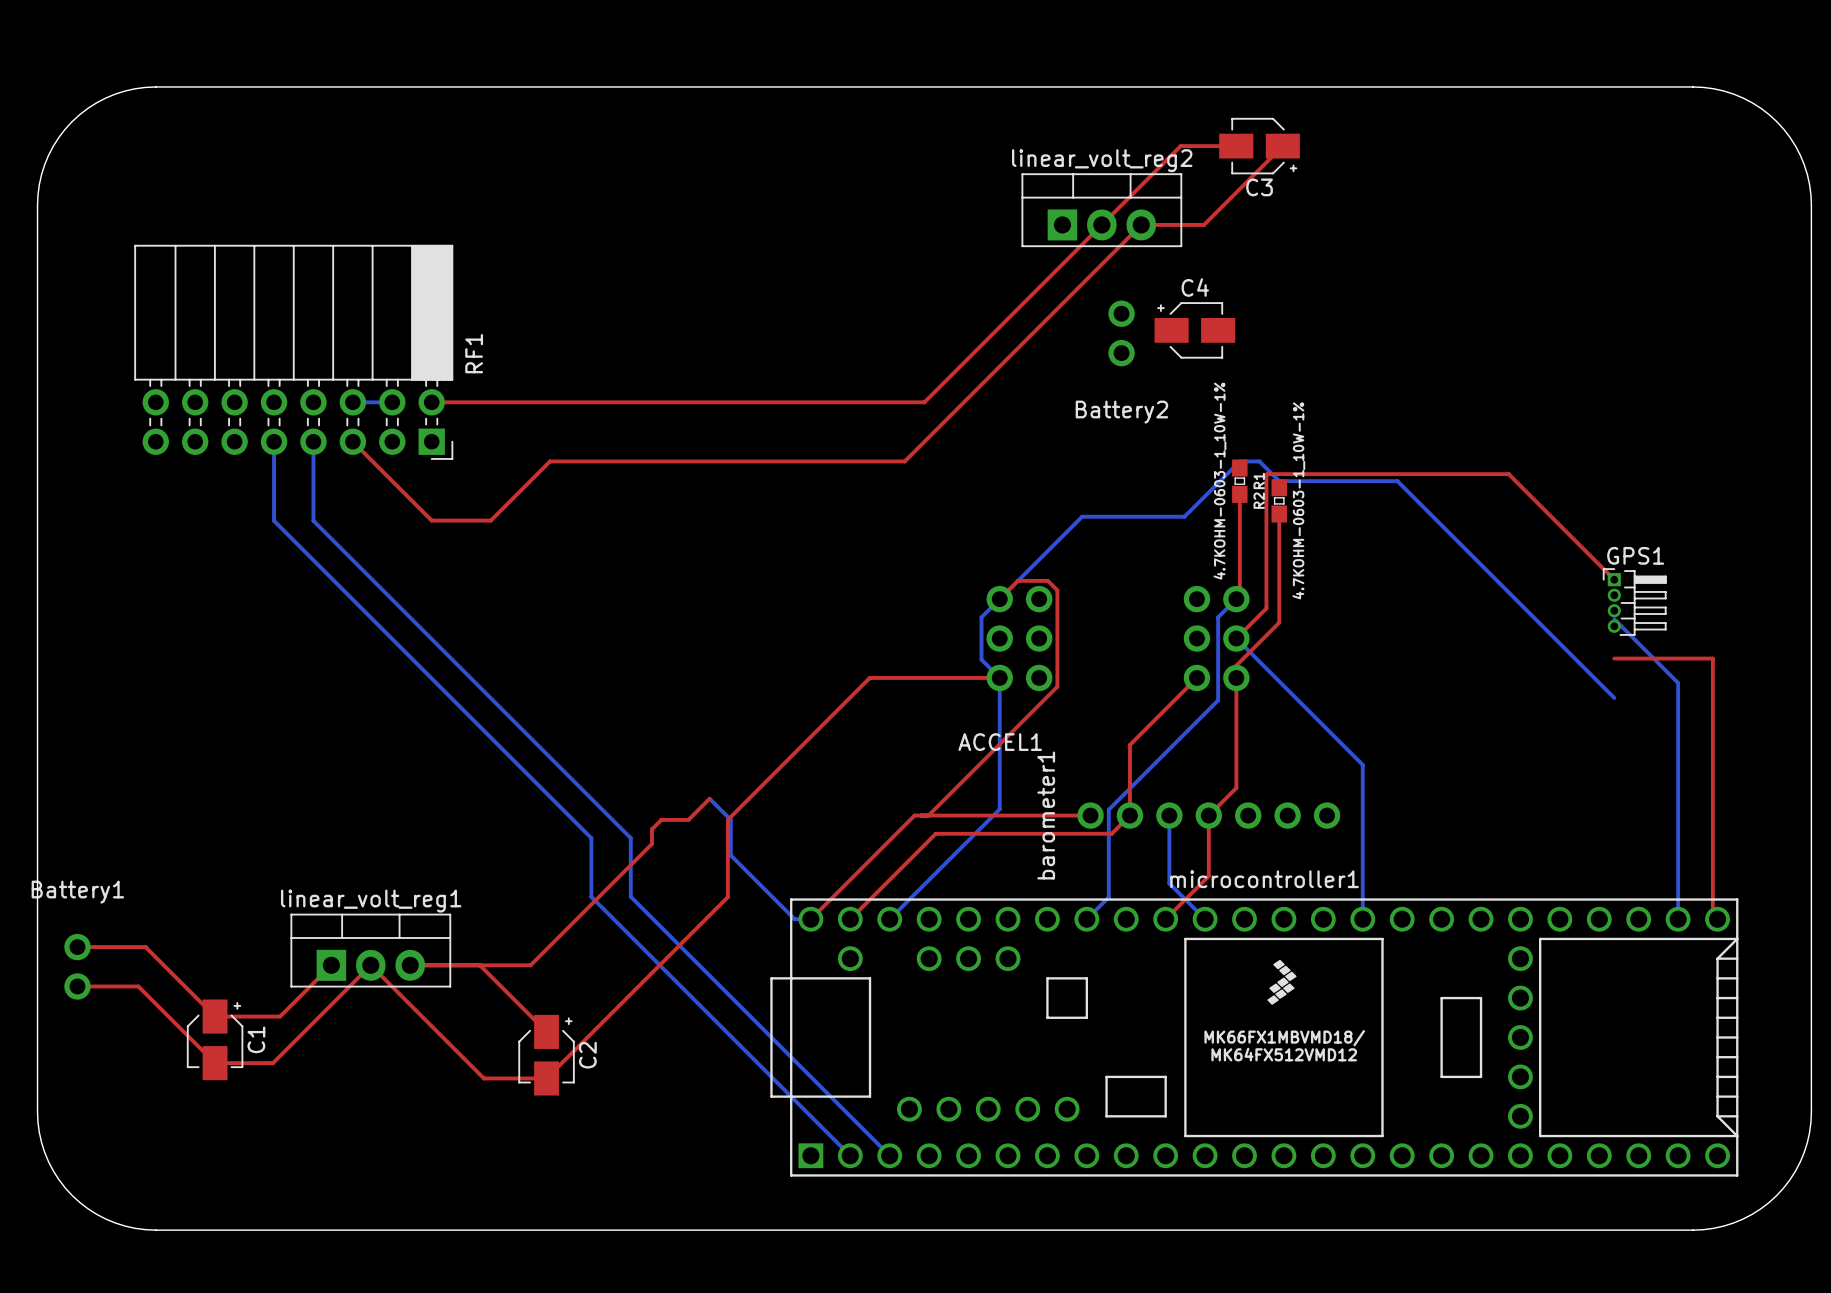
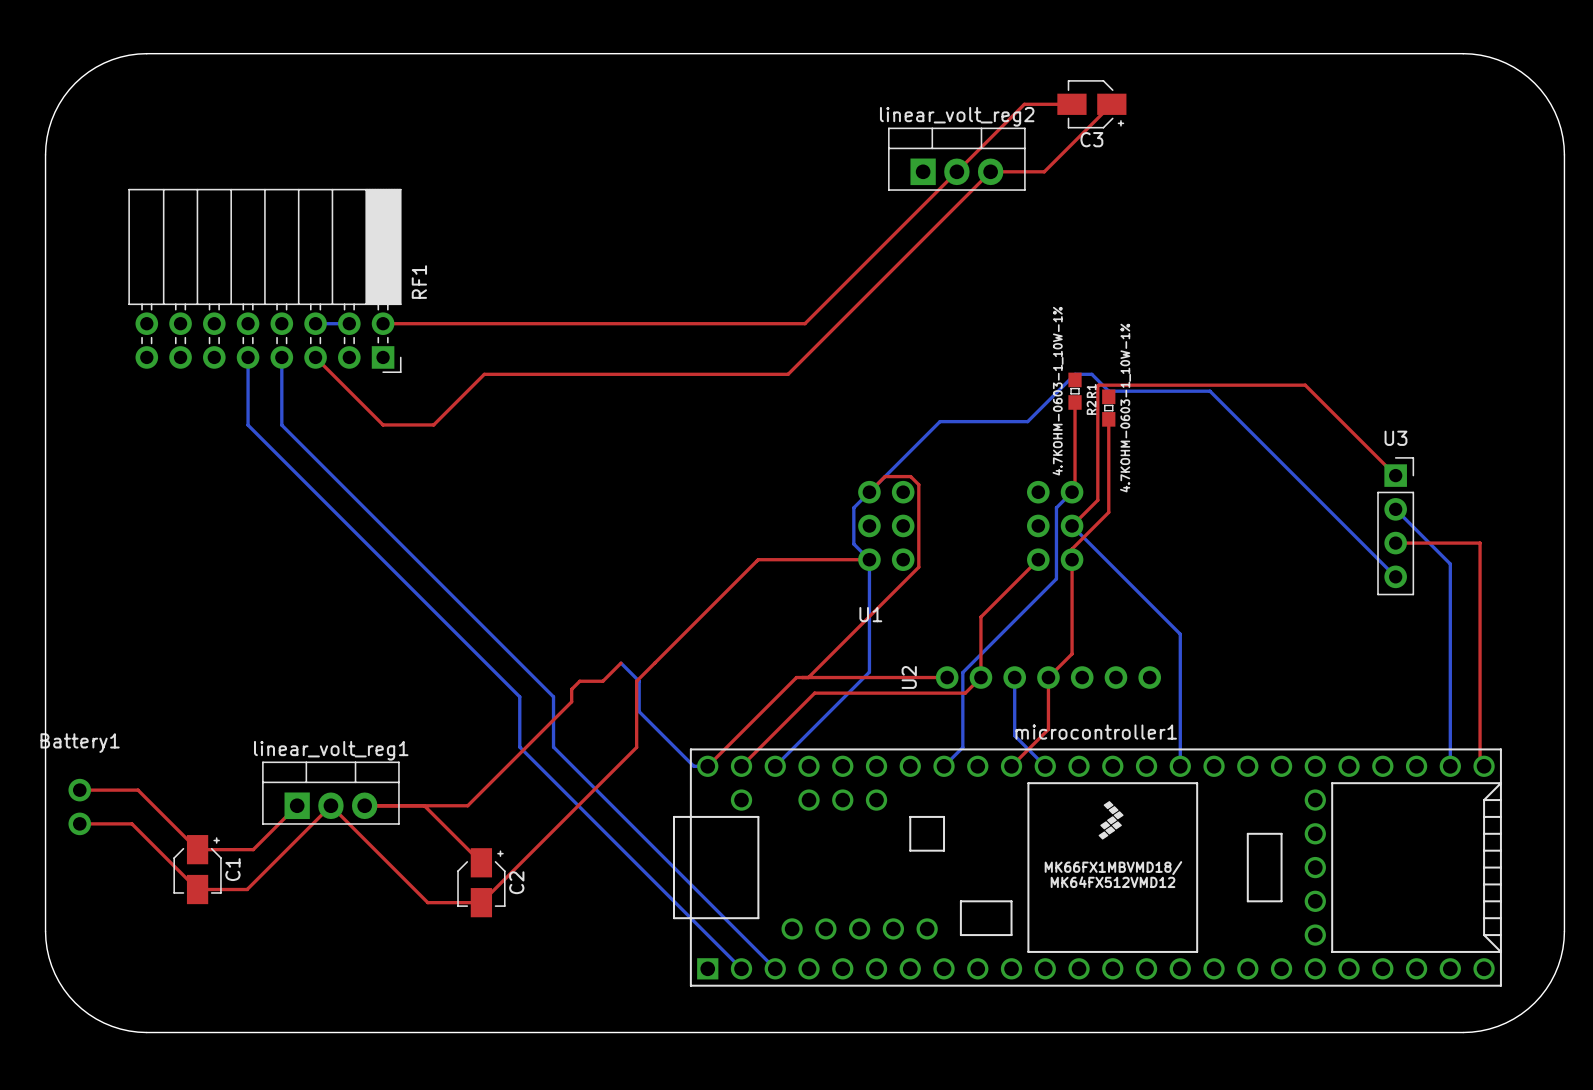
C4: (1194, 330) -> none
Battery2: (1121, 333) -> none
GPS1: (1634, 602) -> none
U3: none -> (1395, 526)
ACCEL1 name: ACCEL1 (1000, 742) -> U1 (870, 614)
barometer1 name: barometer1 (1046, 815) -> U2 (909, 677)

